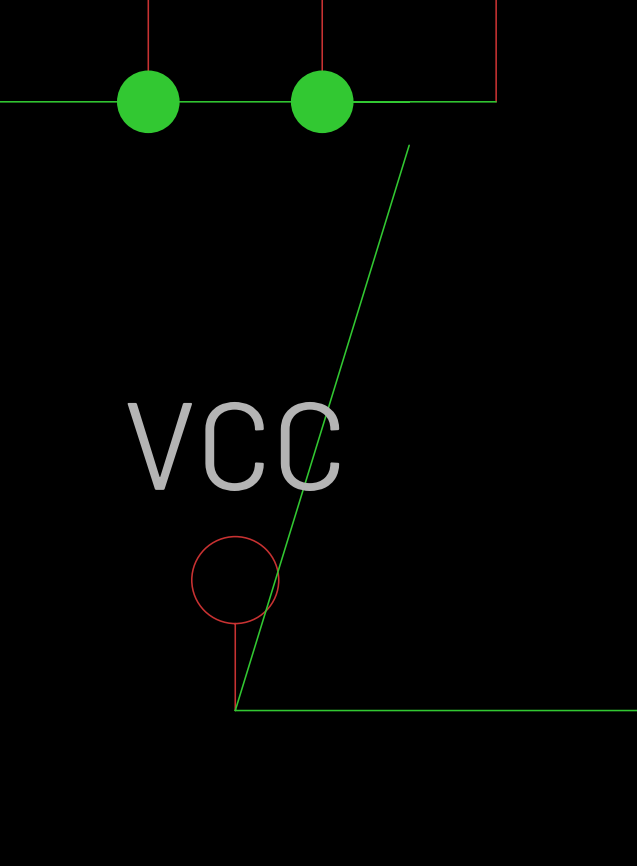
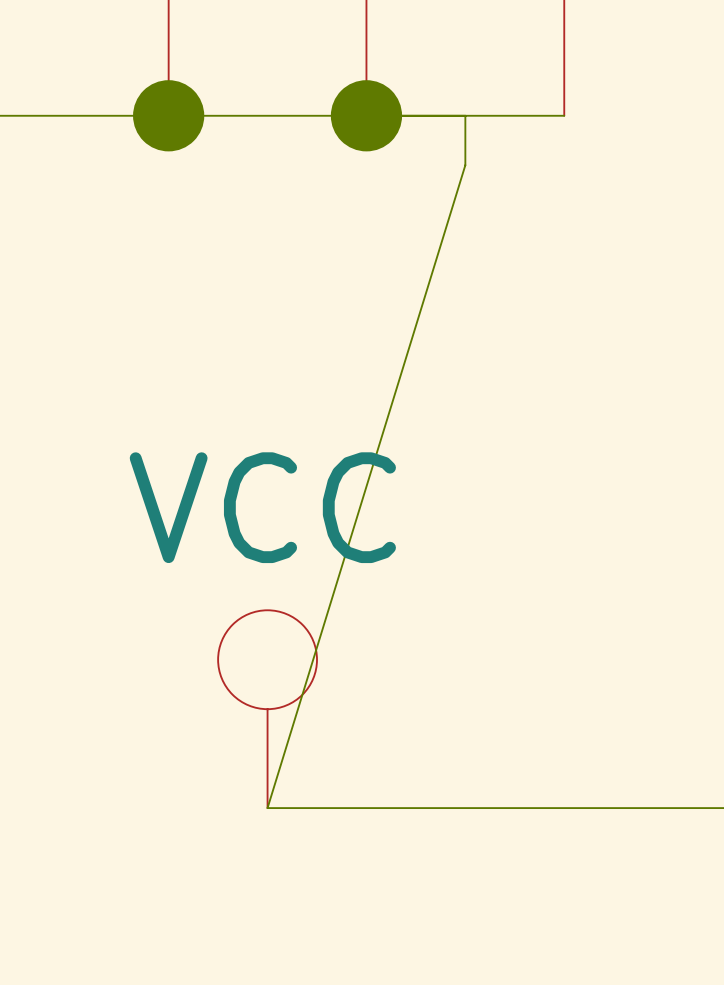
wire: none -> (465, 115) (465, 165)

